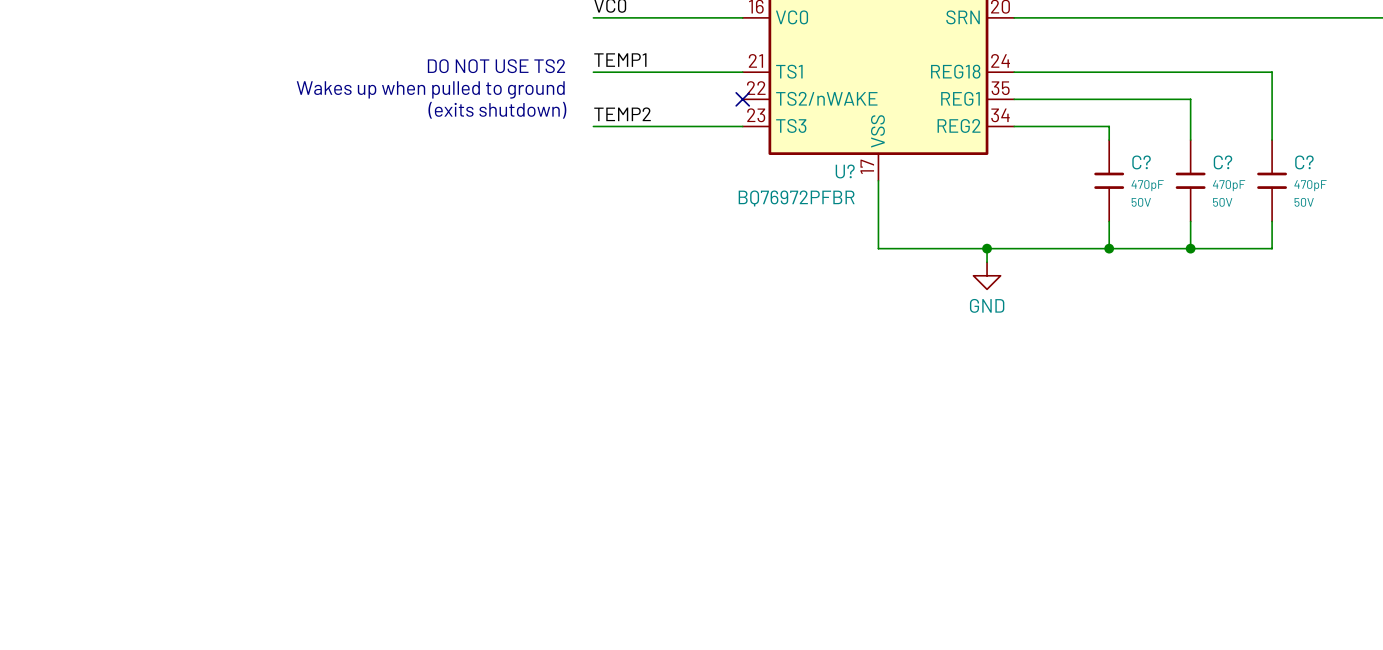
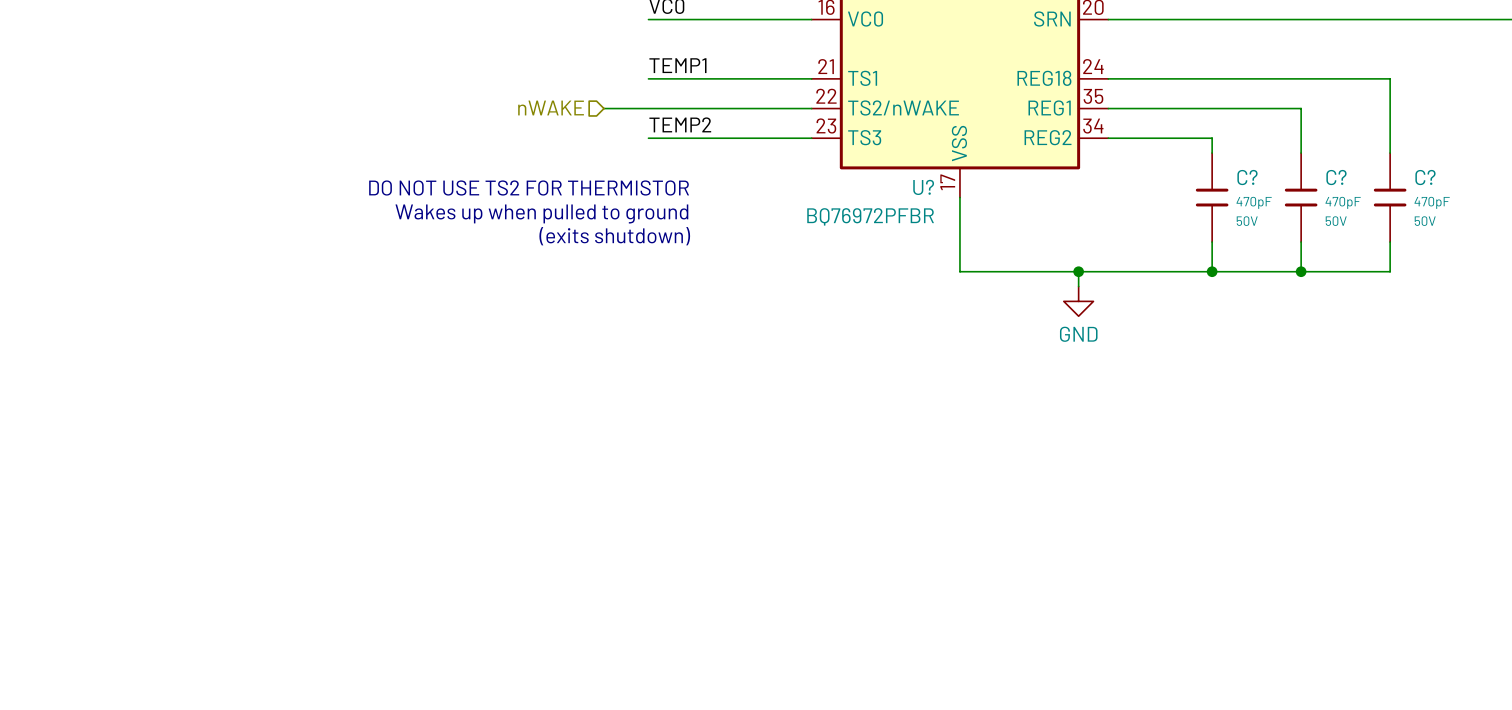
text: DO NOT USE TS2 (496, 66) -> none
text position: Wakes up when pulled to ground (430, 89) -> Wakes up when pulled to ground (541, 213)
hierarchical label: none -> nWAKE (551, 108)
wire: none -> (603, 108) (811, 108)
no-connect mark: (742, 99) -> none
text position: (exits shutdown) (497, 110) -> (exits shutdown) (614, 236)
text: none -> DO NOT USE TS2 FOR THERMISTOR (529, 188)

